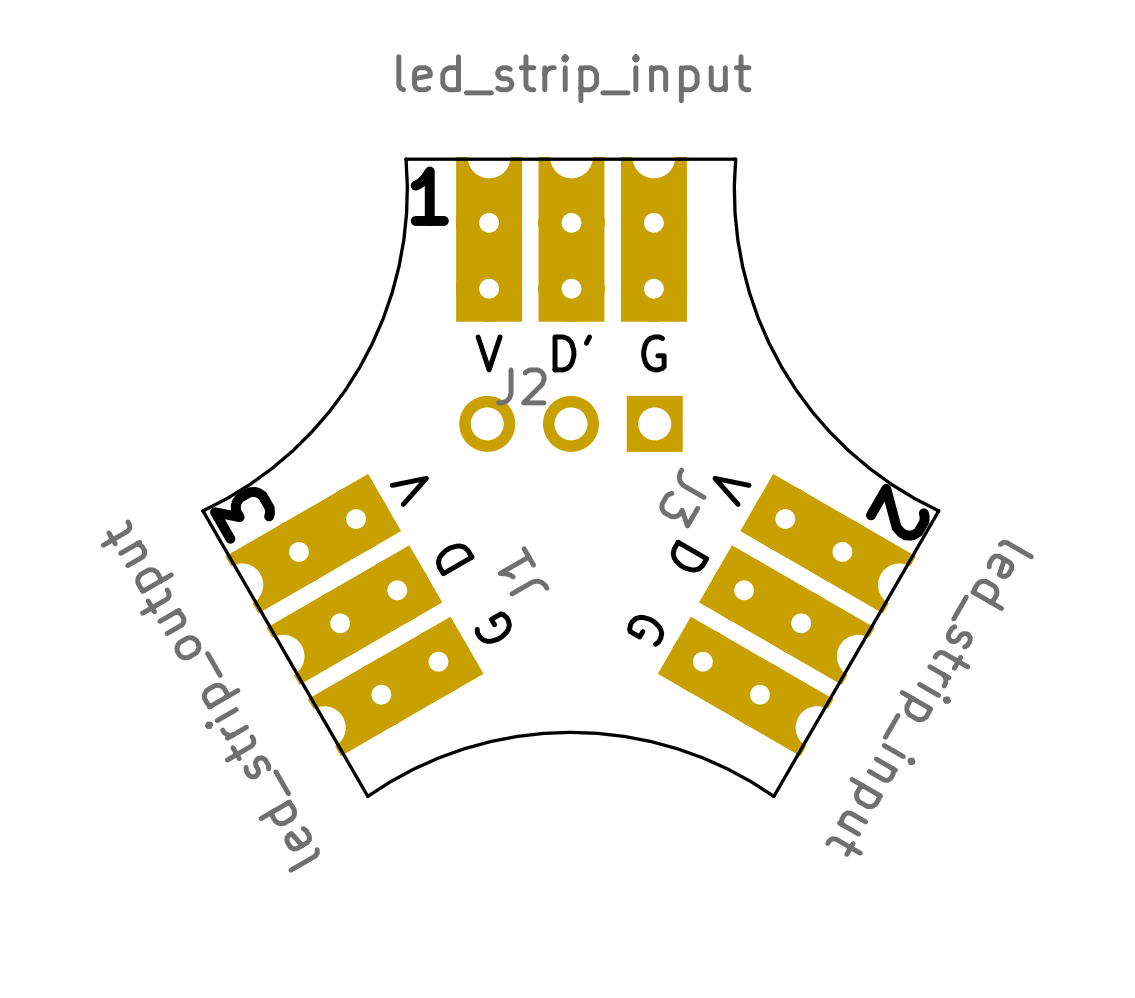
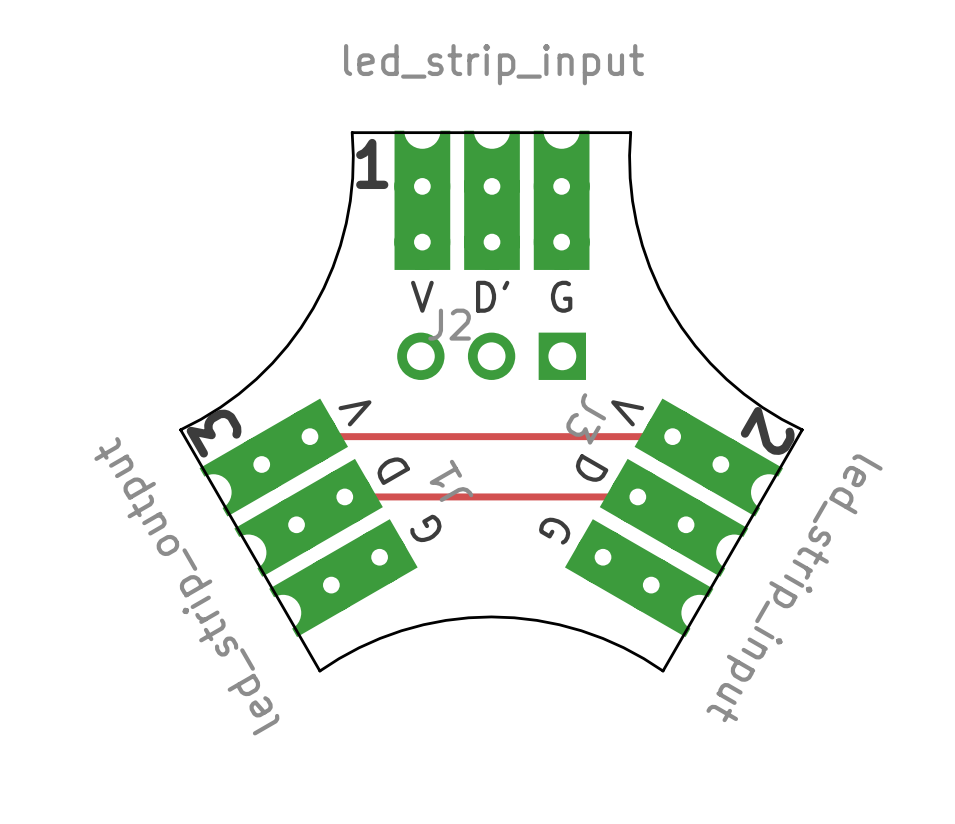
track: none -> (218, 489) (257, 489) (309, 436) (672, 436) (725, 489) (763, 489)
track: none -> (253, 549) (292, 549) (344, 496) (637, 496) (690, 549) (729, 549)

